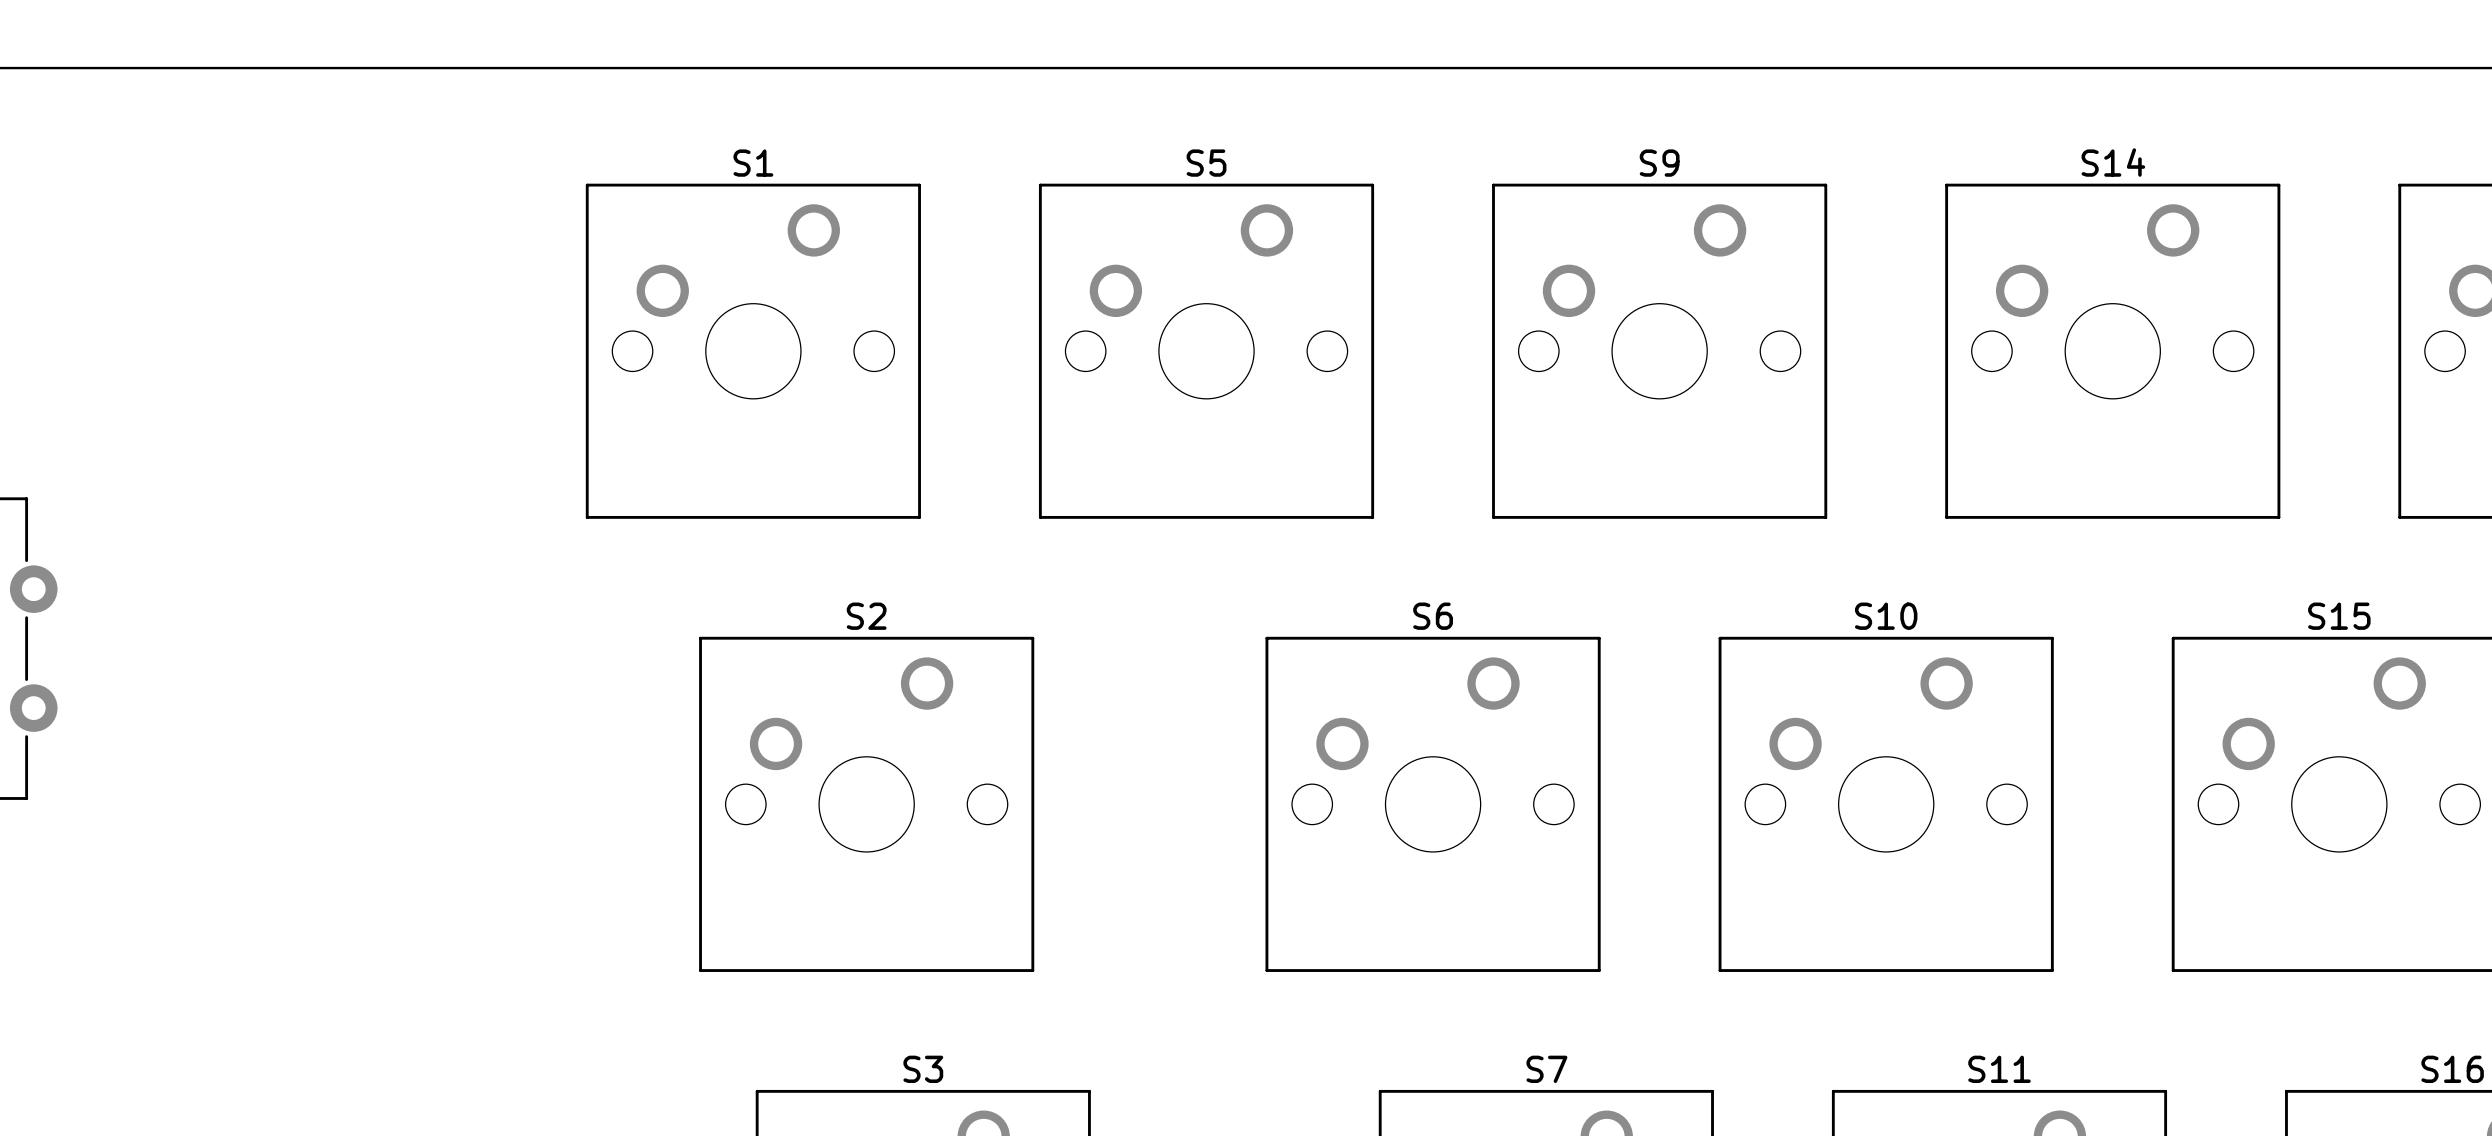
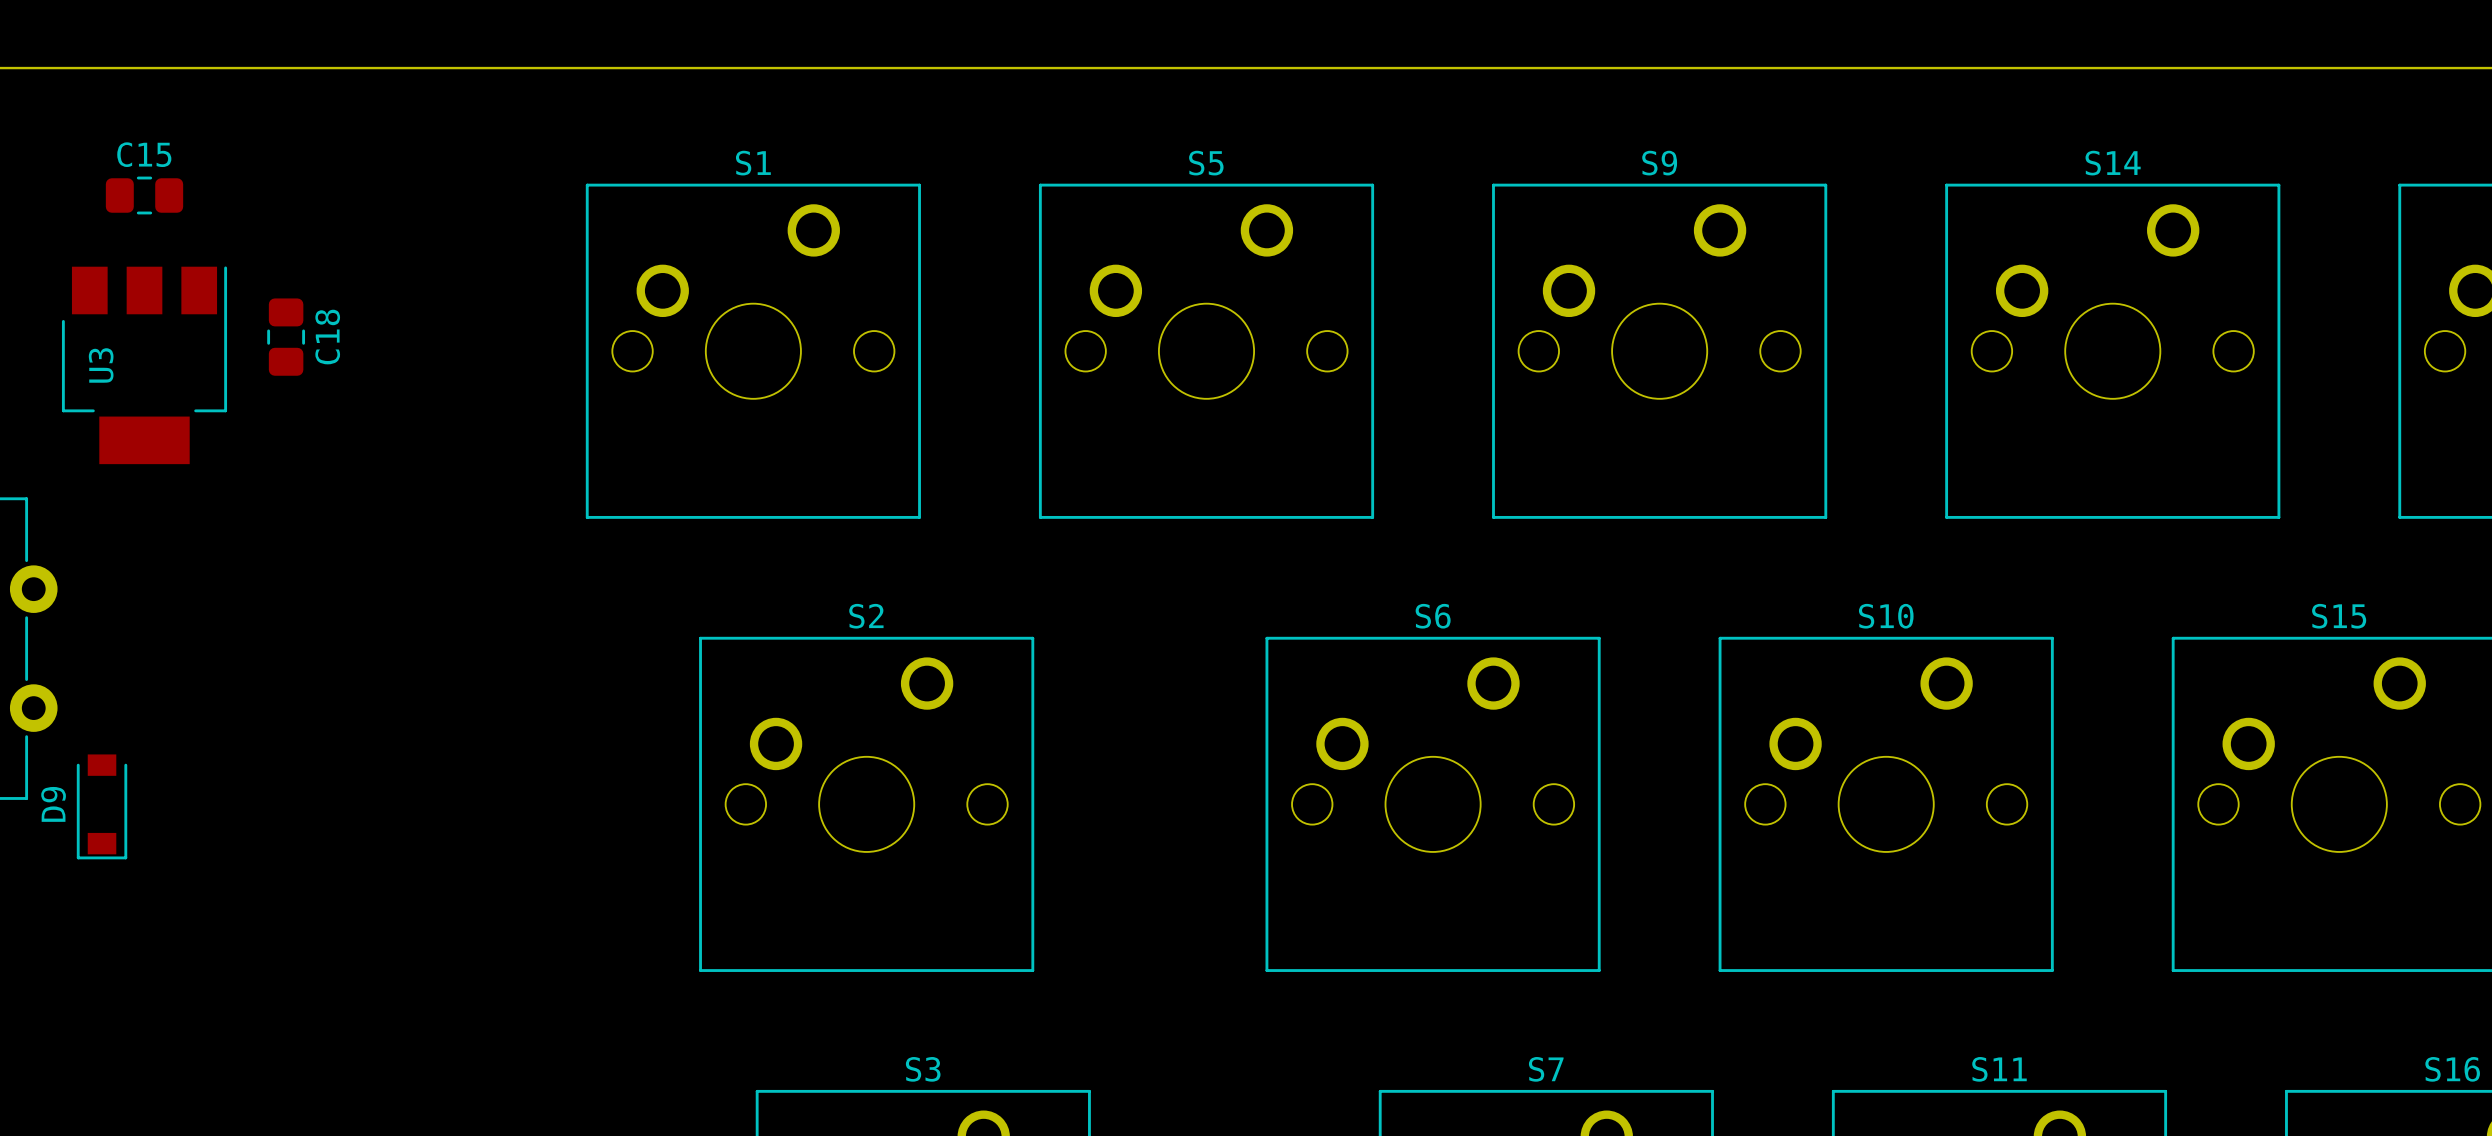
C15: none -> (144, 195)
C18: none -> (286, 337)
U3: none -> (144, 365)
D9: none -> (102, 806)

